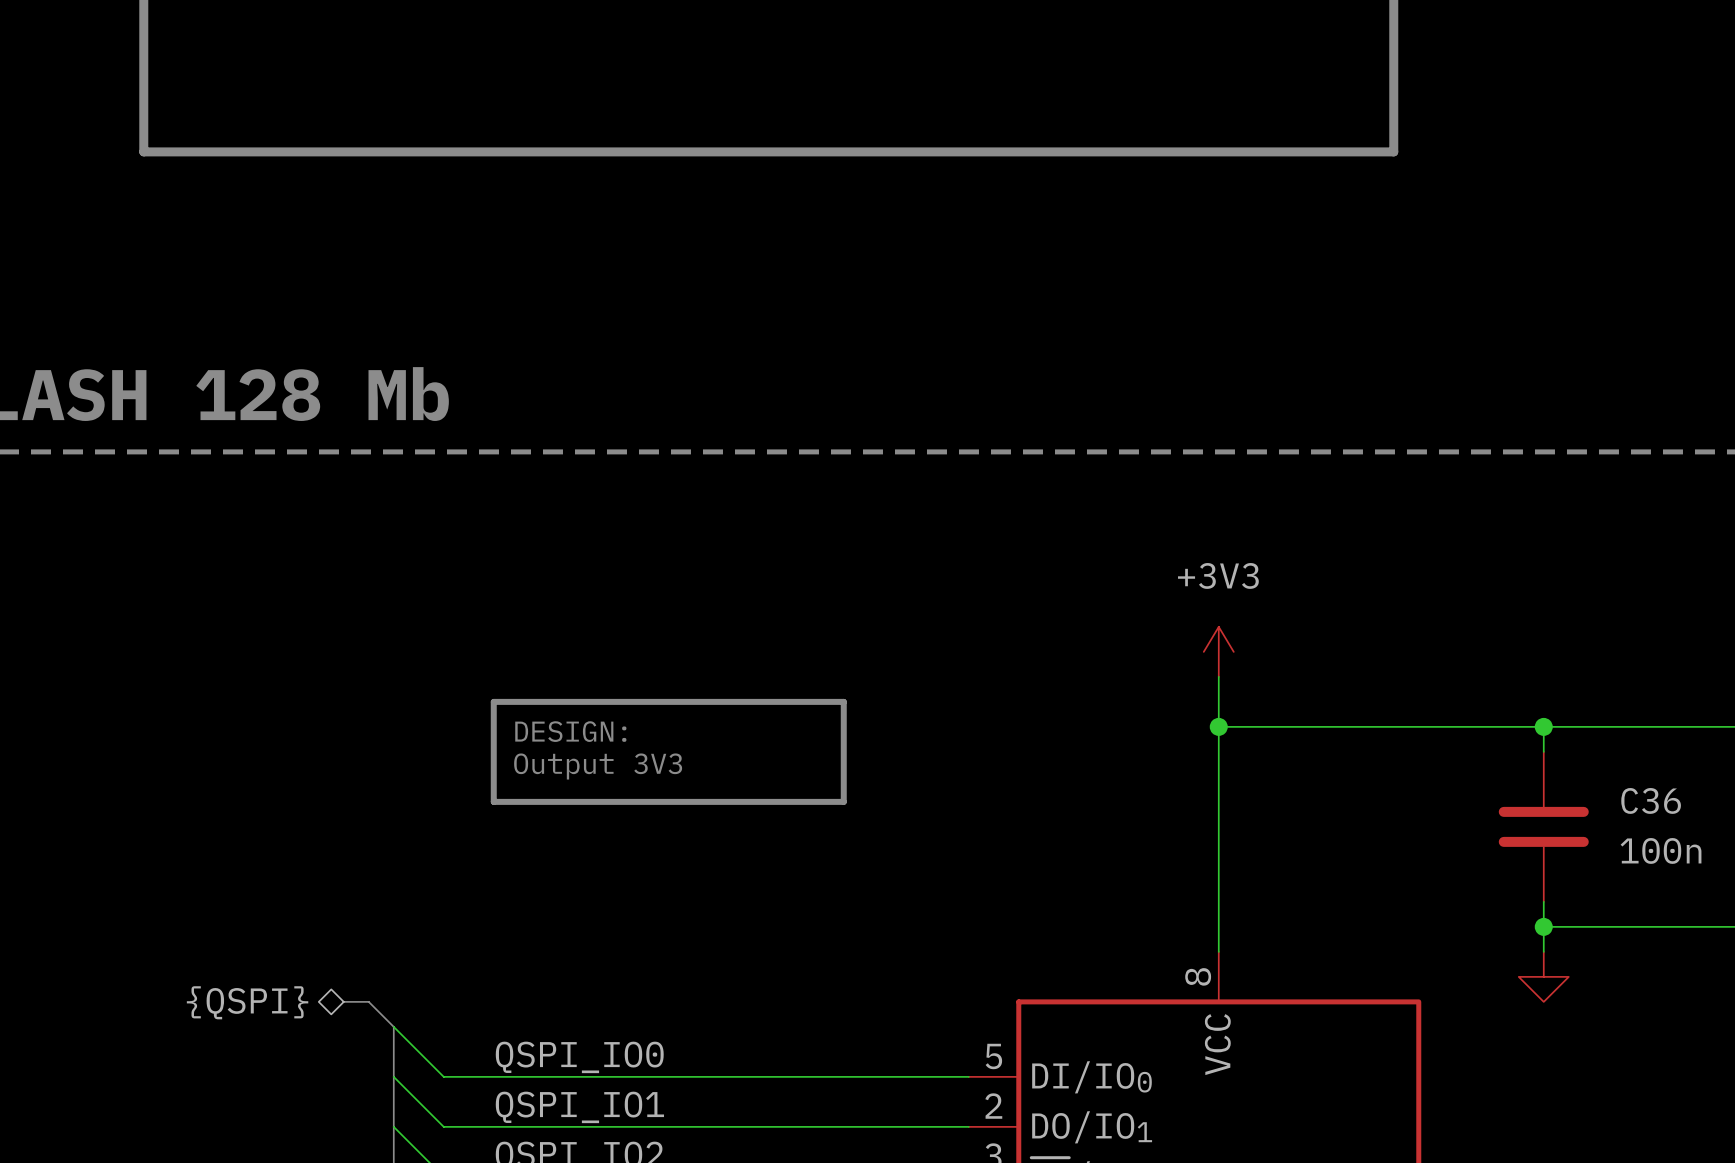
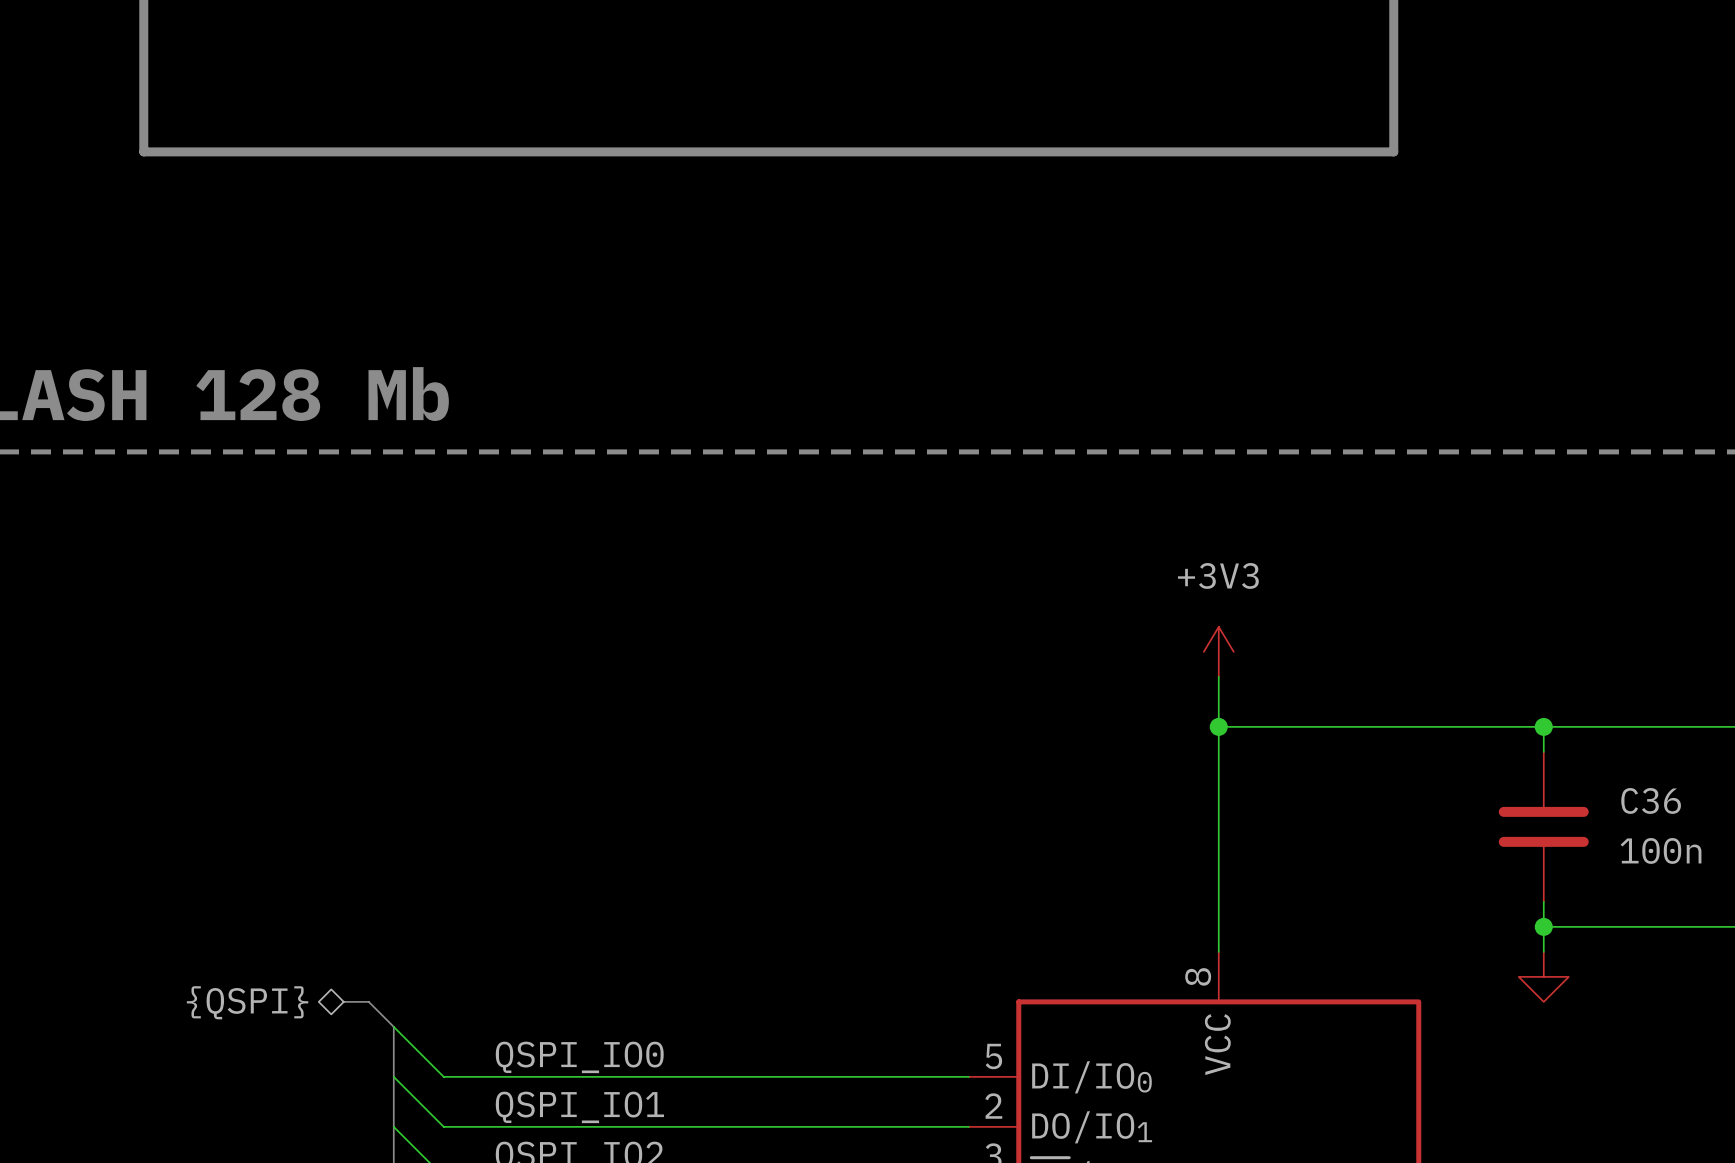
line: (493, 701) (843, 701) (843, 801) (493, 801) (493, 701) -> none
text: DESIGN: (570, 731) -> none
text: Output 3V3 (598, 766) -> none

